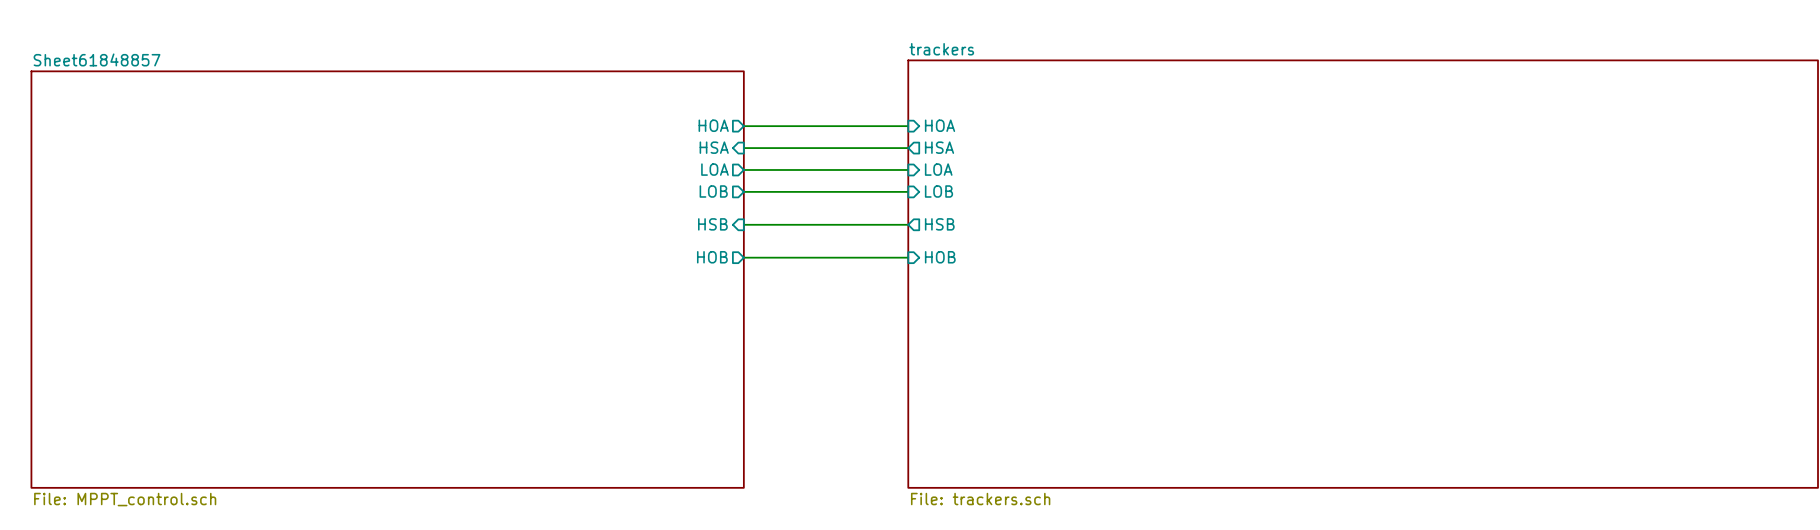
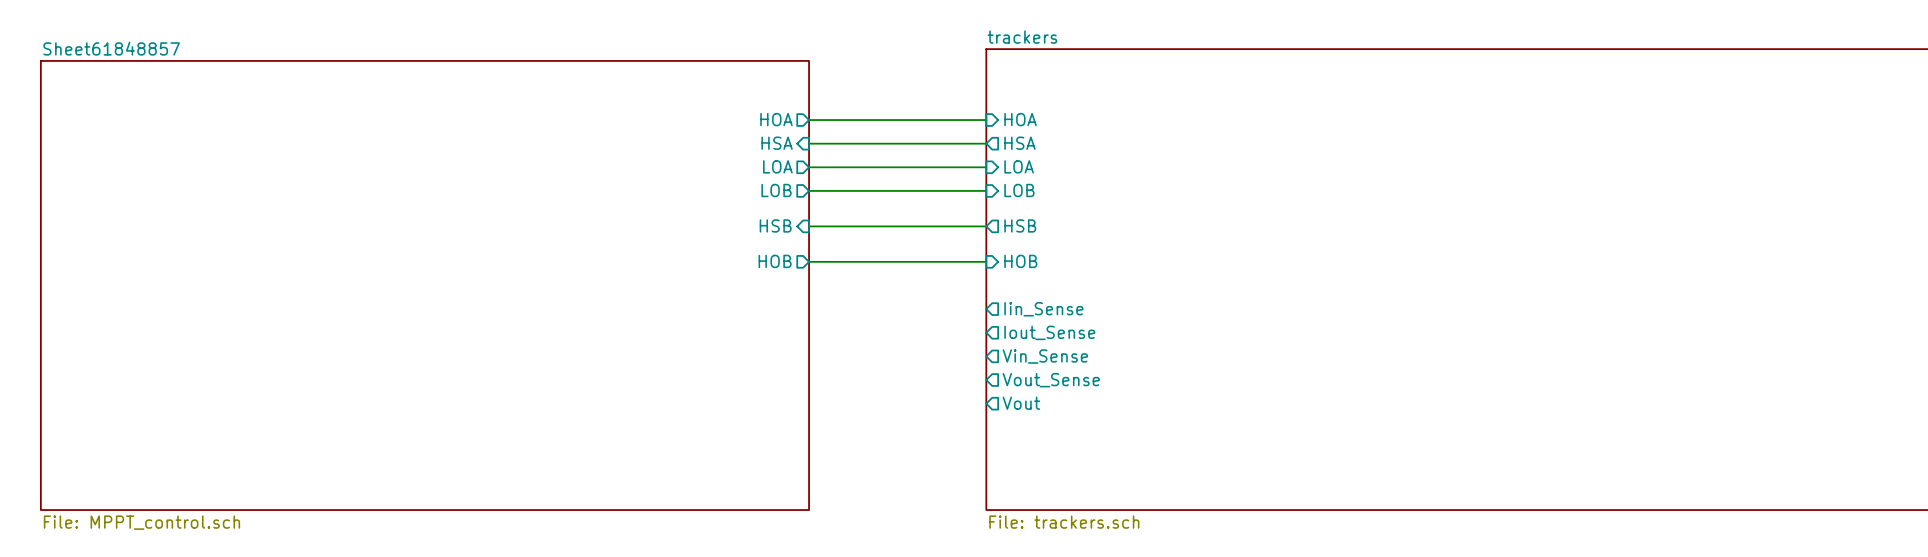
sheet pin: none -> Iin_Sense (1043, 309)
sheet pin: none -> Iout_Sense (1049, 332)
sheet pin: none -> Vin_Sense (1045, 356)
sheet pin: none -> Vout_Sense (1051, 380)
sheet pin: none -> Vout (1021, 403)

